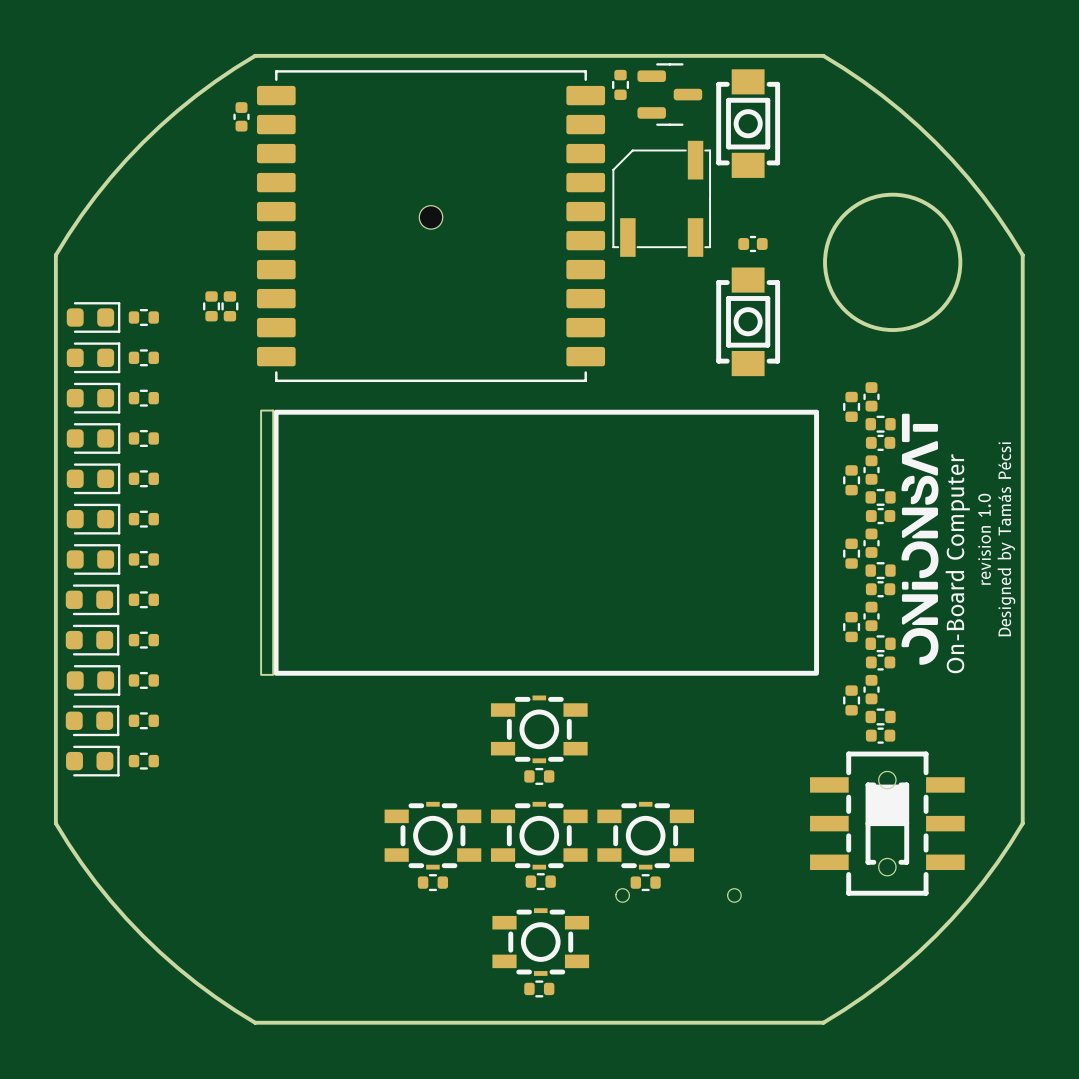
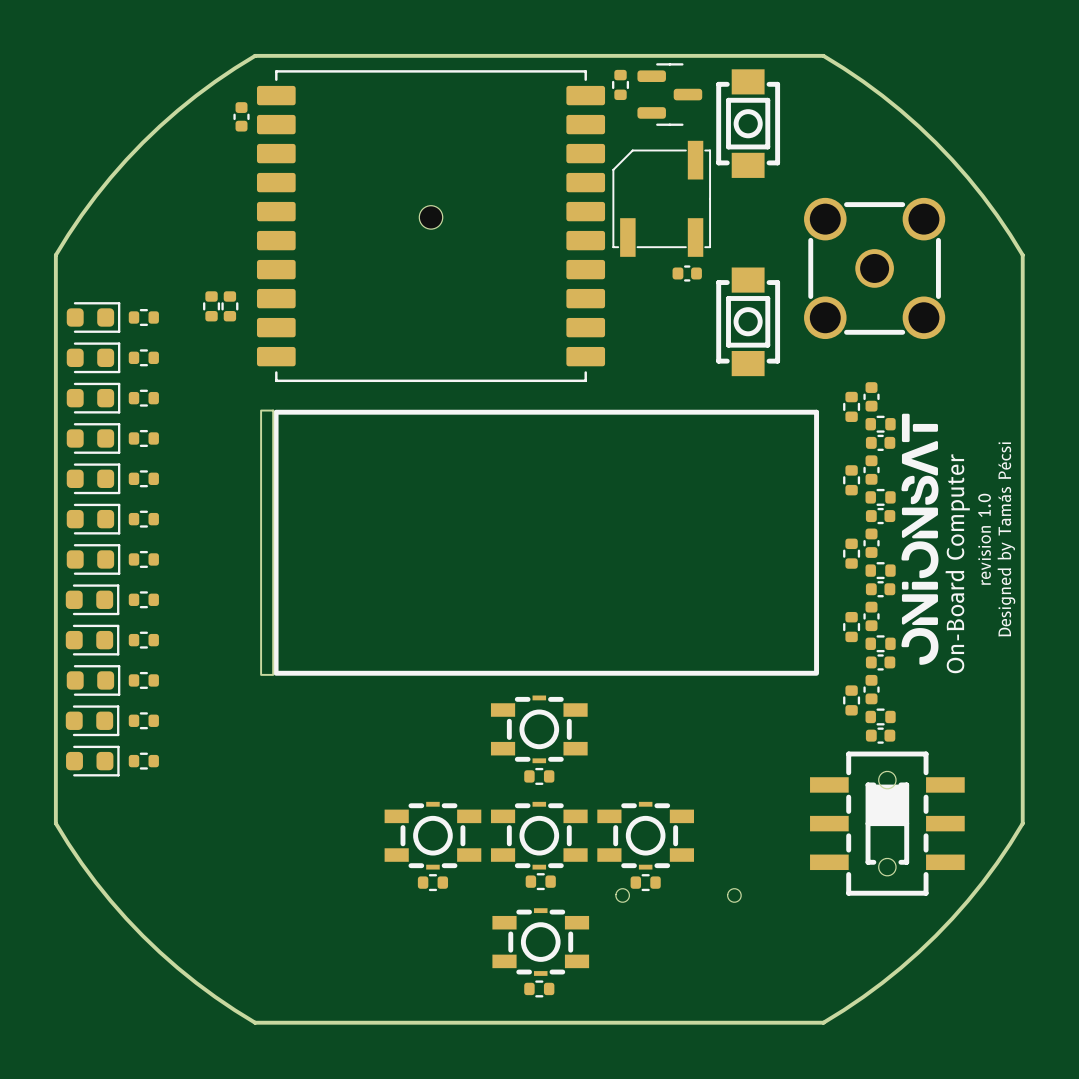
round board edge: [823, 192, 963, 332] -> none
part position: (752, 243) -> (687, 273)
part: none -> (874, 268)

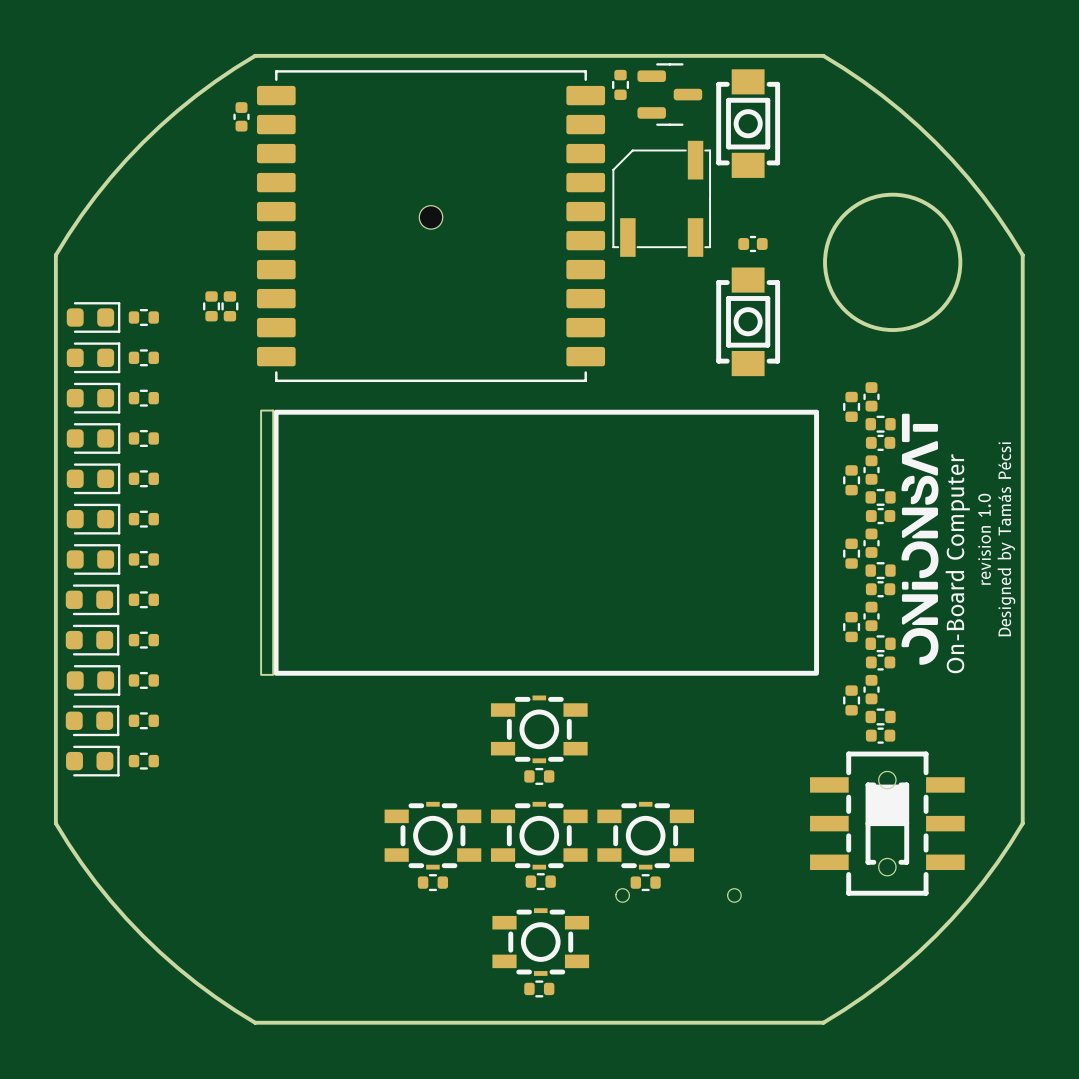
round board edge: none -> [823, 192, 963, 332]
part: (874, 268) -> none
part position: (687, 273) -> (752, 243)

